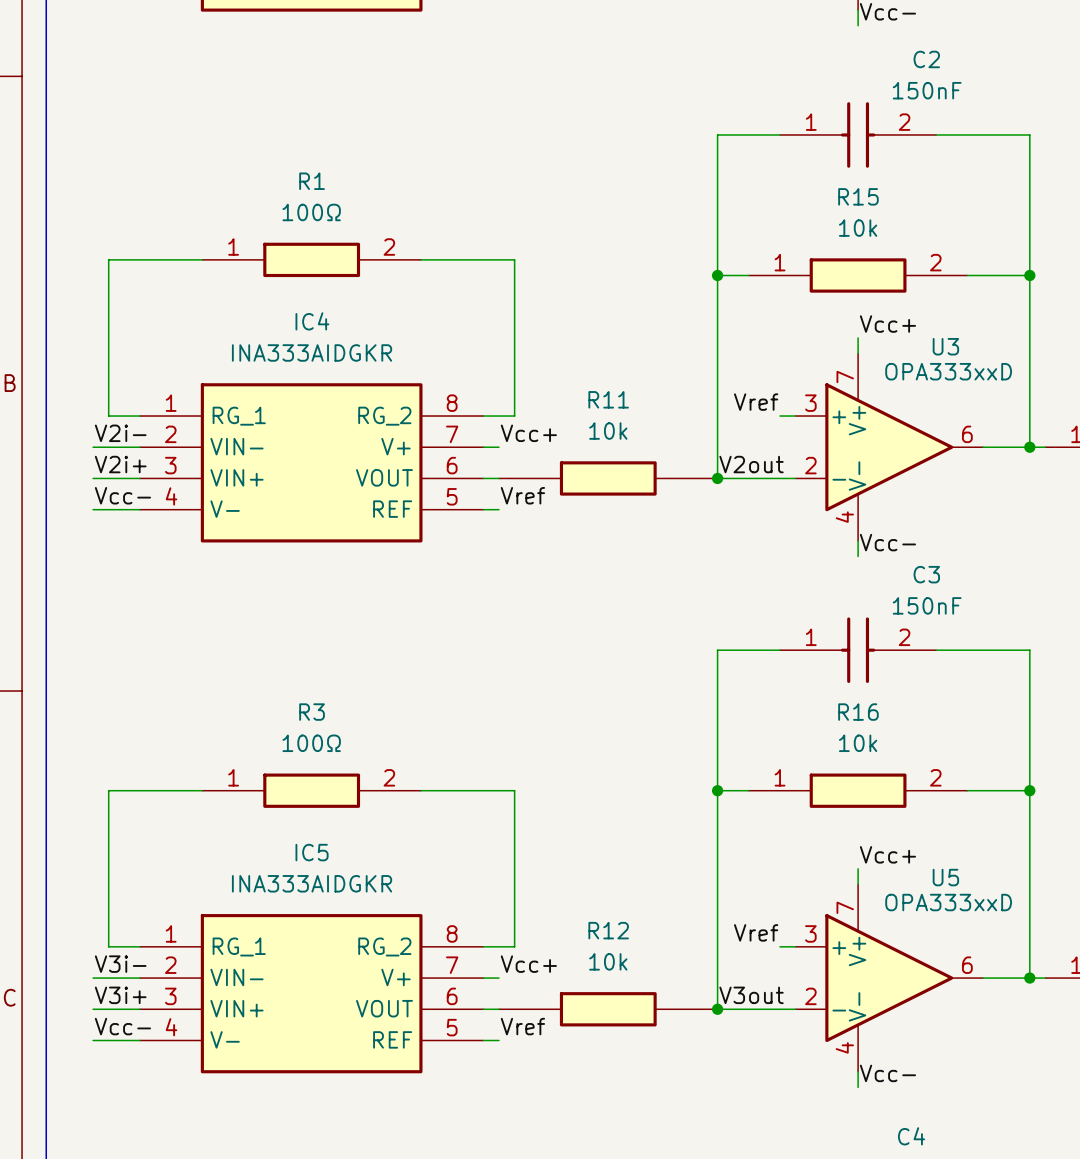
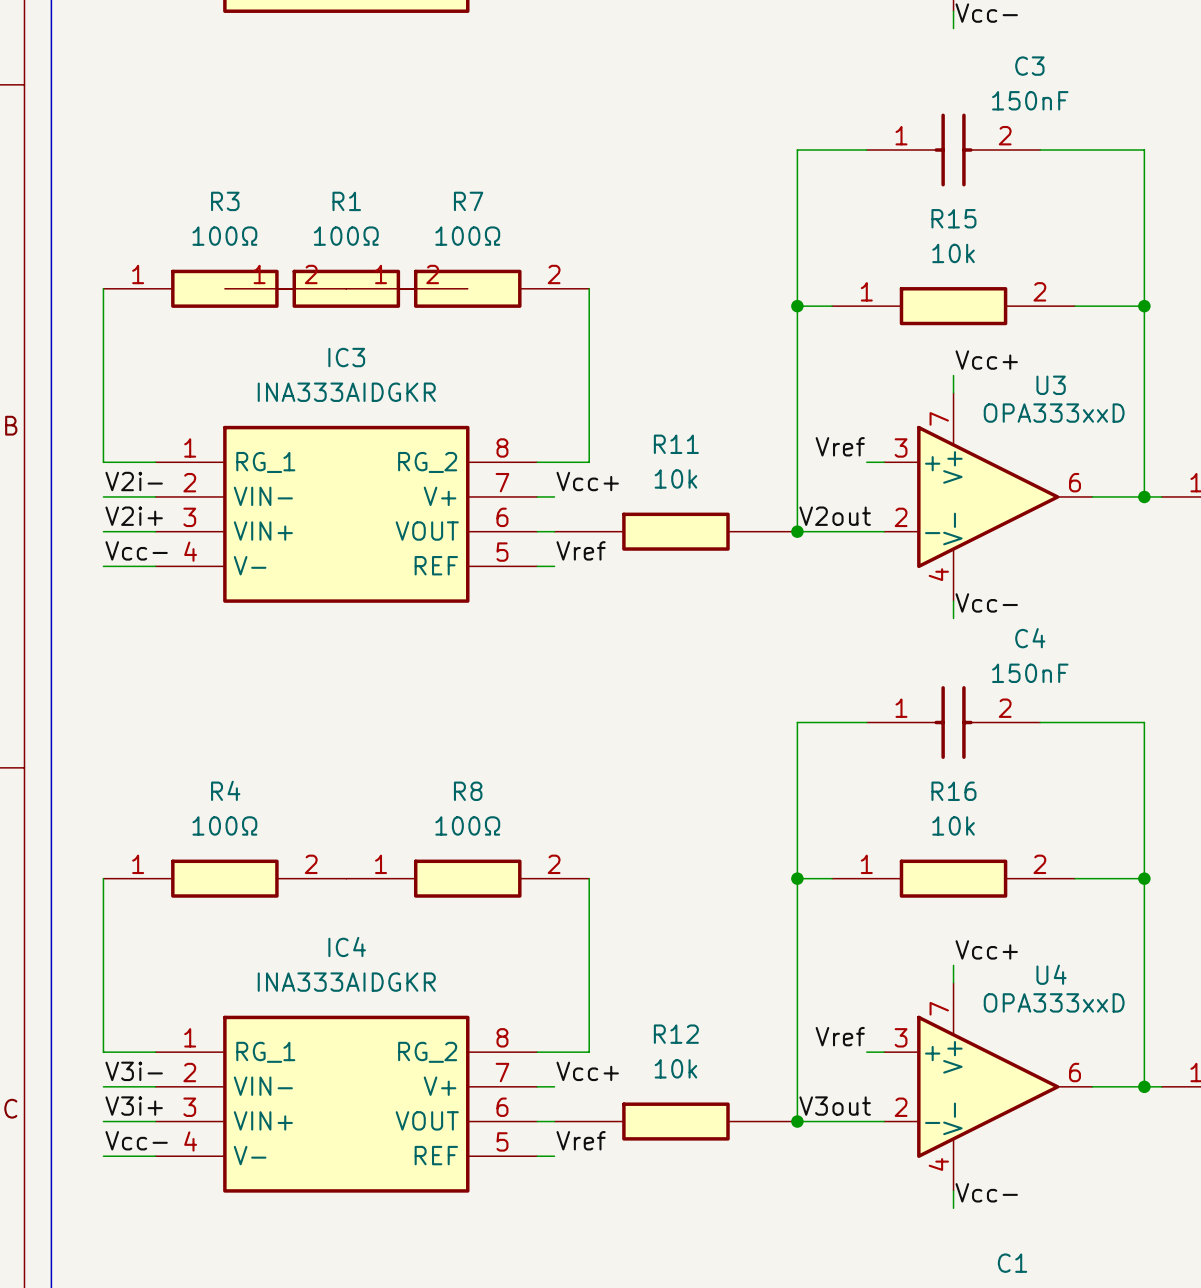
C2 name: C2 (926, 59) -> C3 (1029, 66)
wire: (202, 259) (108, 259) (108, 416) -> (103, 288) (103, 462) (120, 462)
wire: (420, 259) (514, 259) (514, 416) -> (589, 288) (589, 462) (571, 462)
R7: none -> 100Ω (467, 288)
IC4 name: IC4 (312, 321) -> IC3 (346, 357)
C3 name: C3 (926, 574) -> C4 (1030, 638)
wire: (202, 790) (108, 790) (108, 946) -> (103, 878) (103, 1052) (120, 1052)
R4: none -> 100Ω (224, 878)
R3 position: (311, 790) -> (224, 288)
wire: (420, 790) (514, 790) (514, 946) -> (589, 878) (589, 1052) (571, 1052)
R8: none -> 100Ω (467, 878)
IC5 name: IC5 (312, 852) -> IC4 (347, 946)
U5 name: U5 (945, 877) -> U4 (1051, 974)
C4 name: C4 (911, 1136) -> C1 (1012, 1263)

